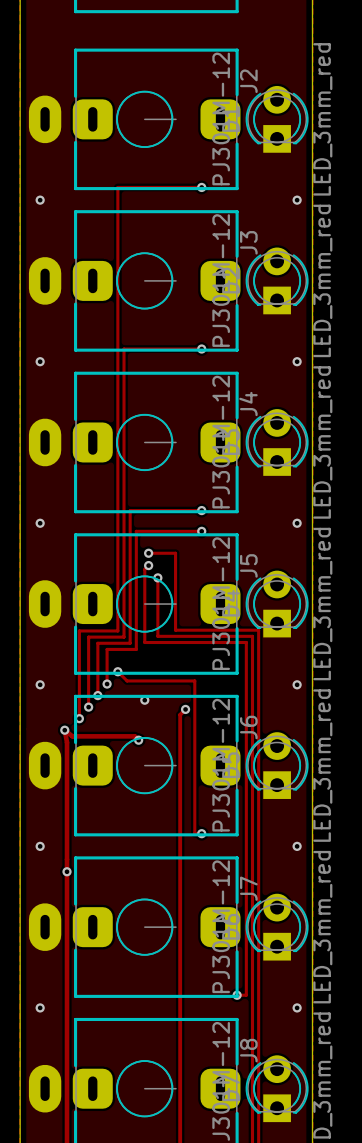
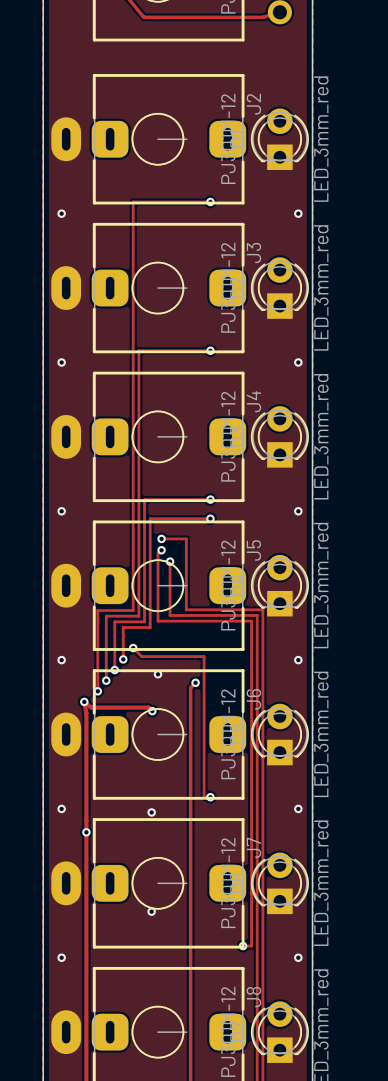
via: none -> (151, 812)
via: none -> (151, 911)

